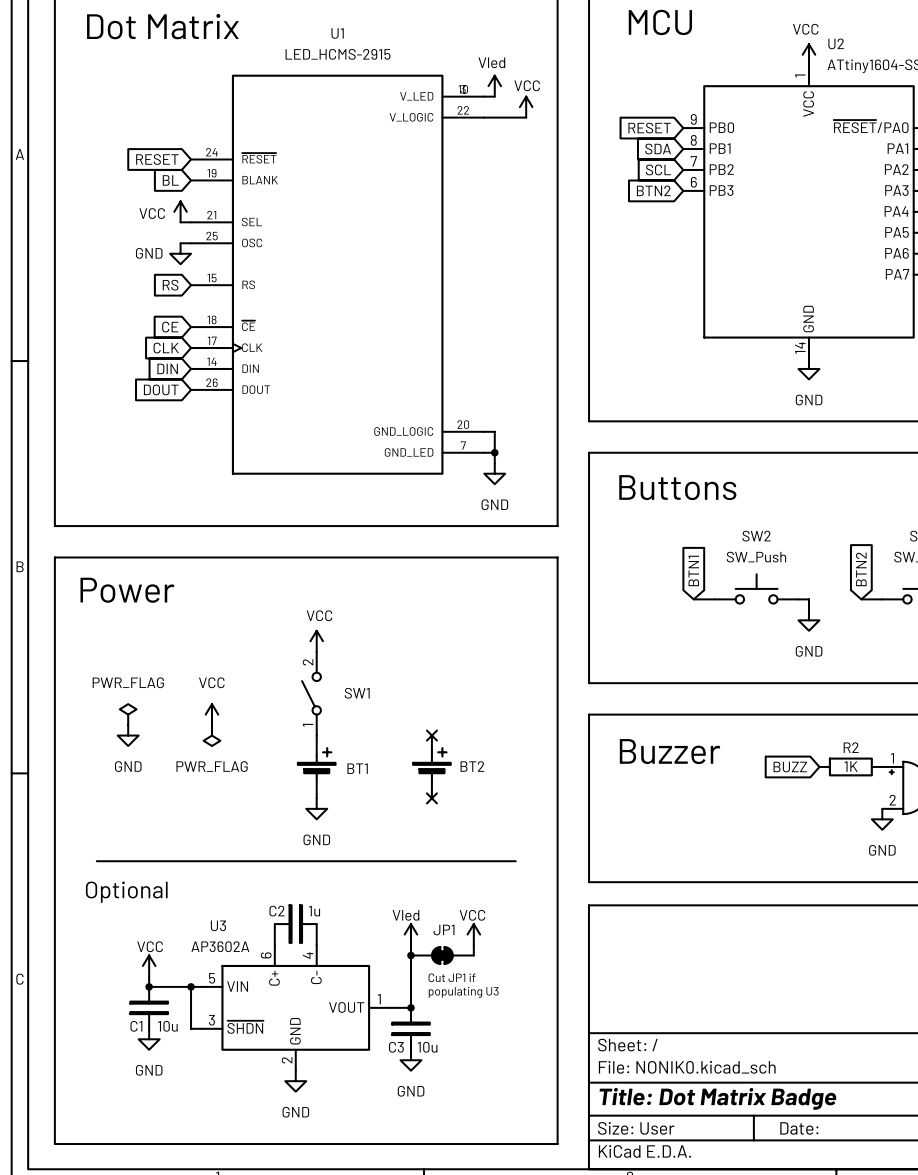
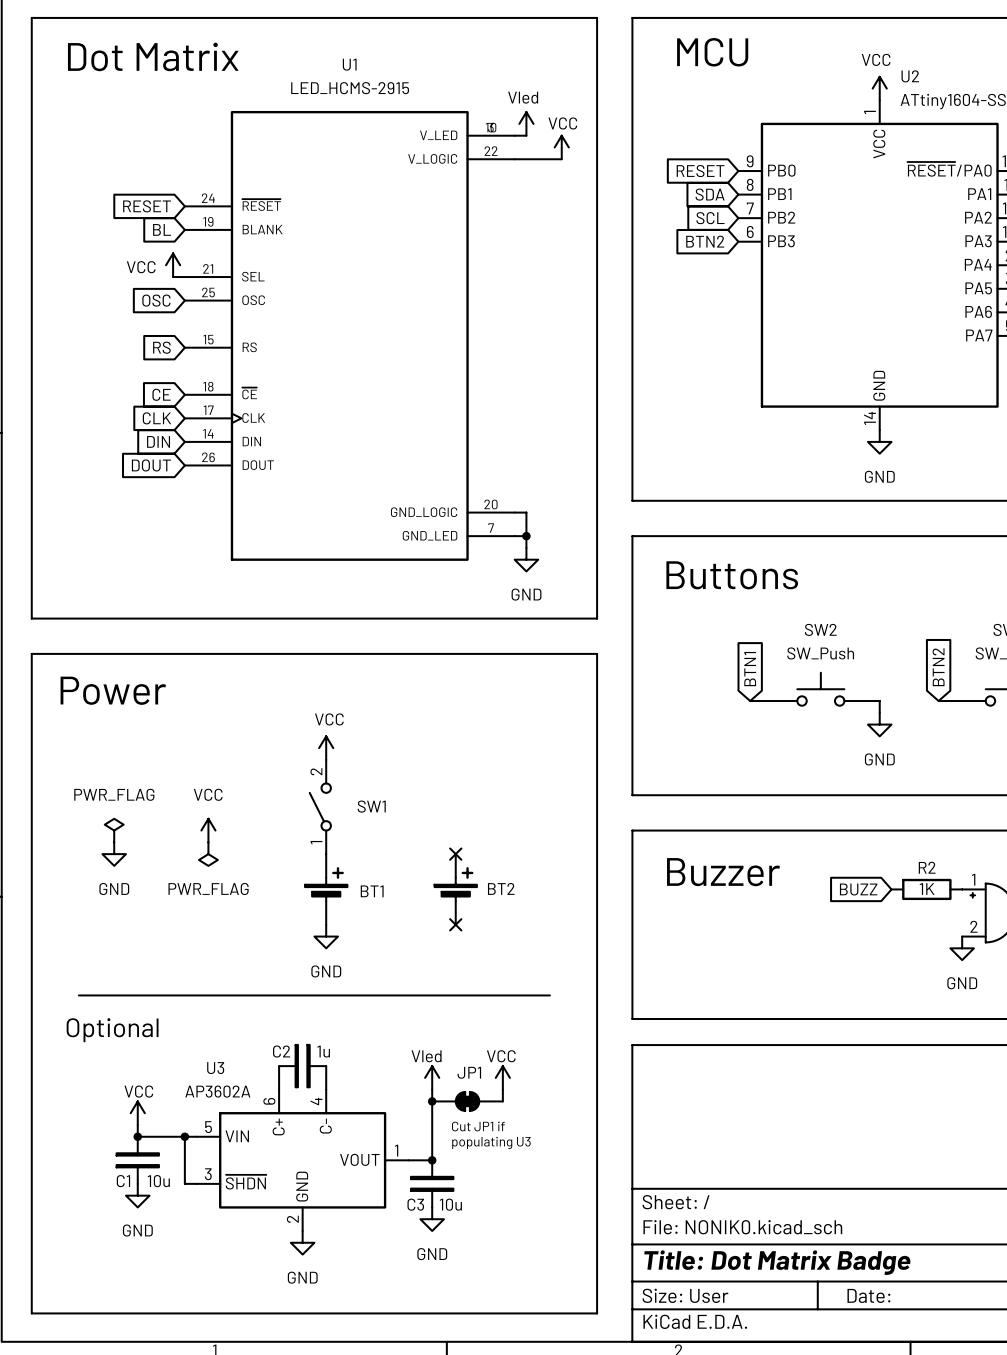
global label: none -> OSC (156, 300)
wire: (180, 243) (191, 243) -> none
power symbol: GND (180, 253) -> none

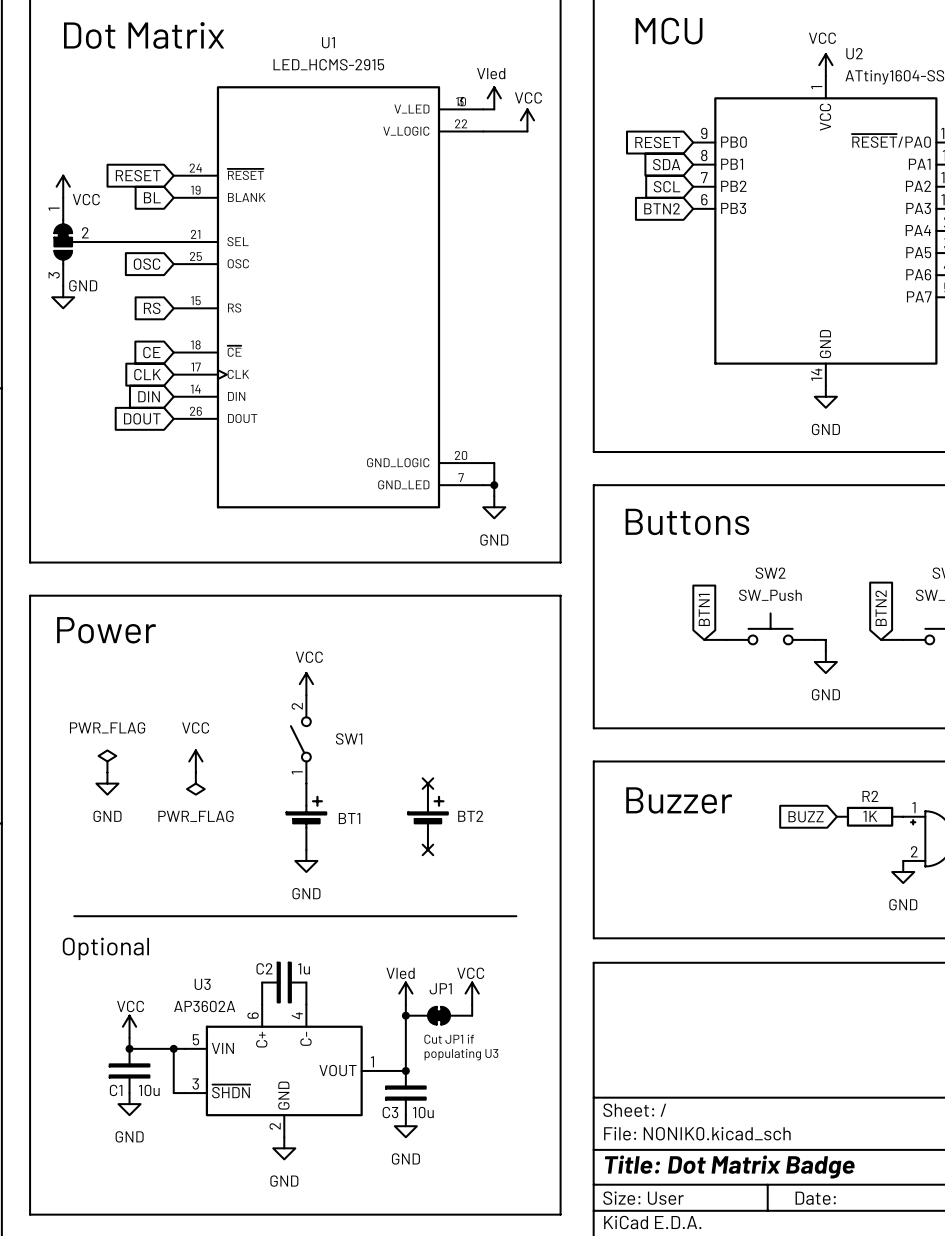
power symbol position: VCC (173, 265) -> VCC (63, 186)
power symbol text position: VCC (141, 267) -> VCC (86, 199)
part: none -> (75, 242)
wire: none -> (96, 242) (162, 242)
power symbol: none -> GND (63, 297)

